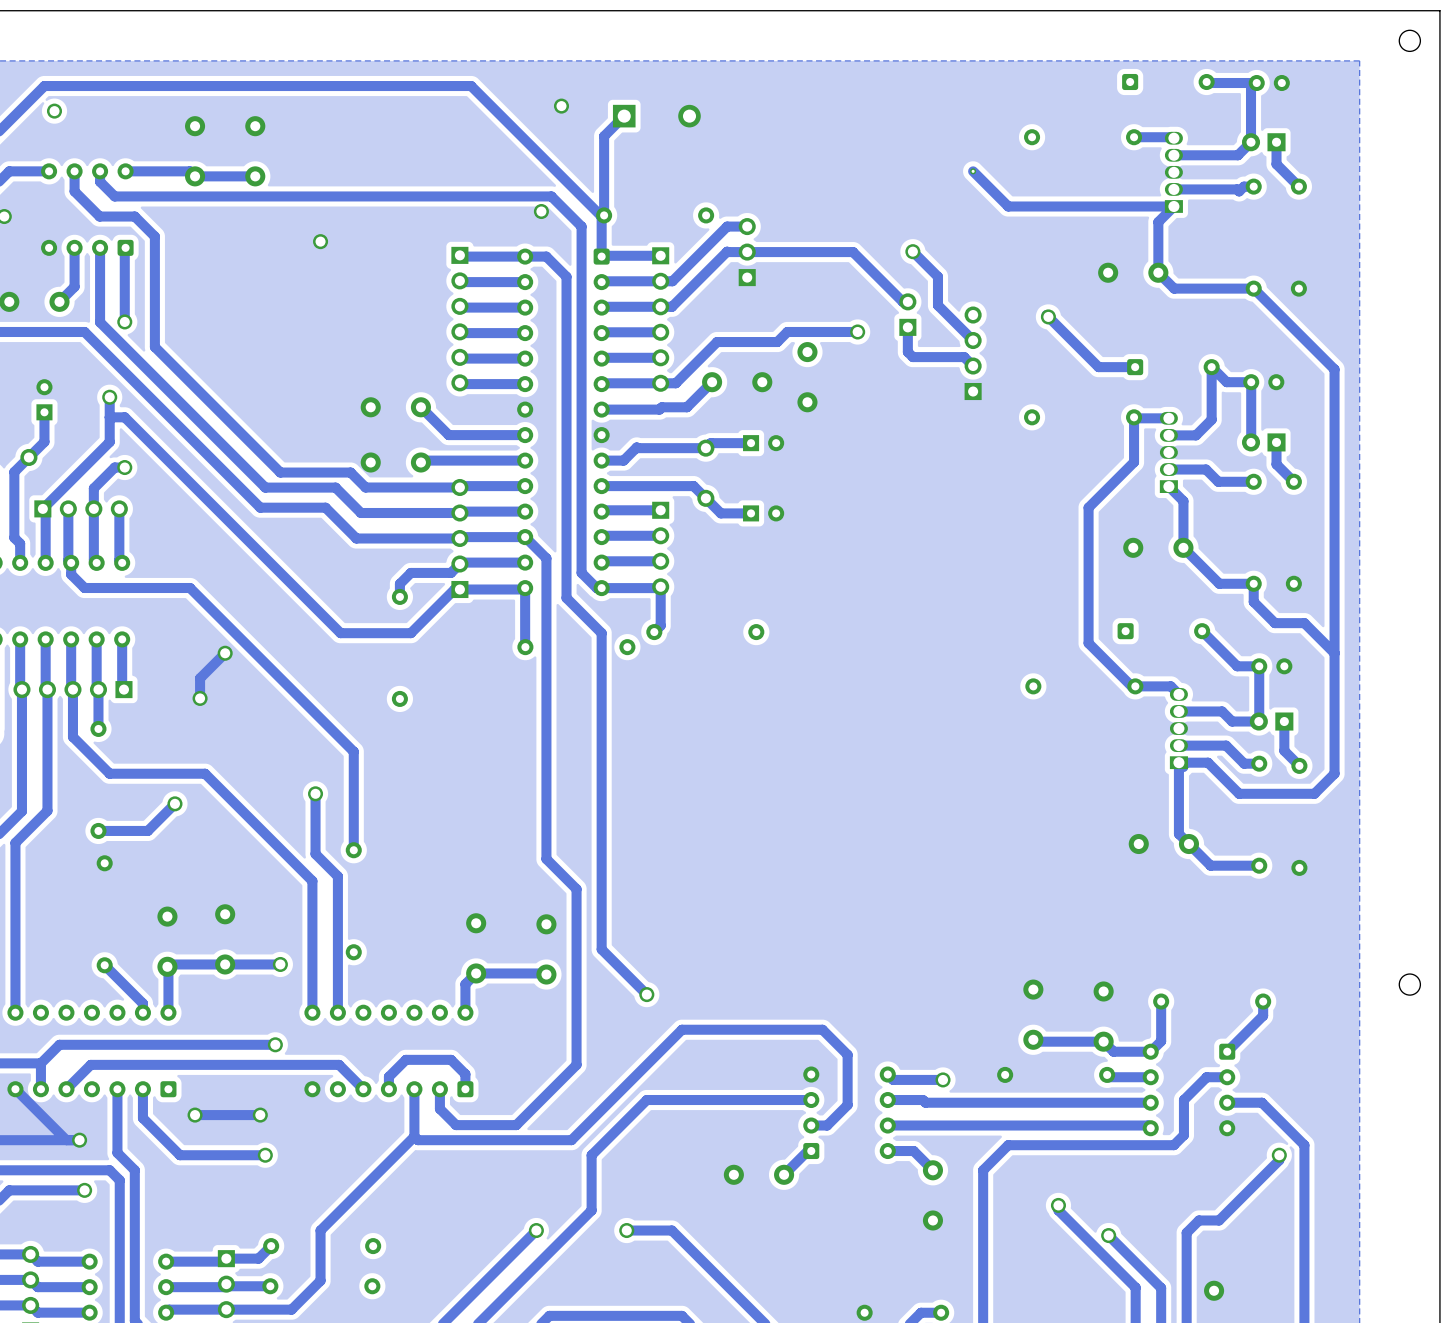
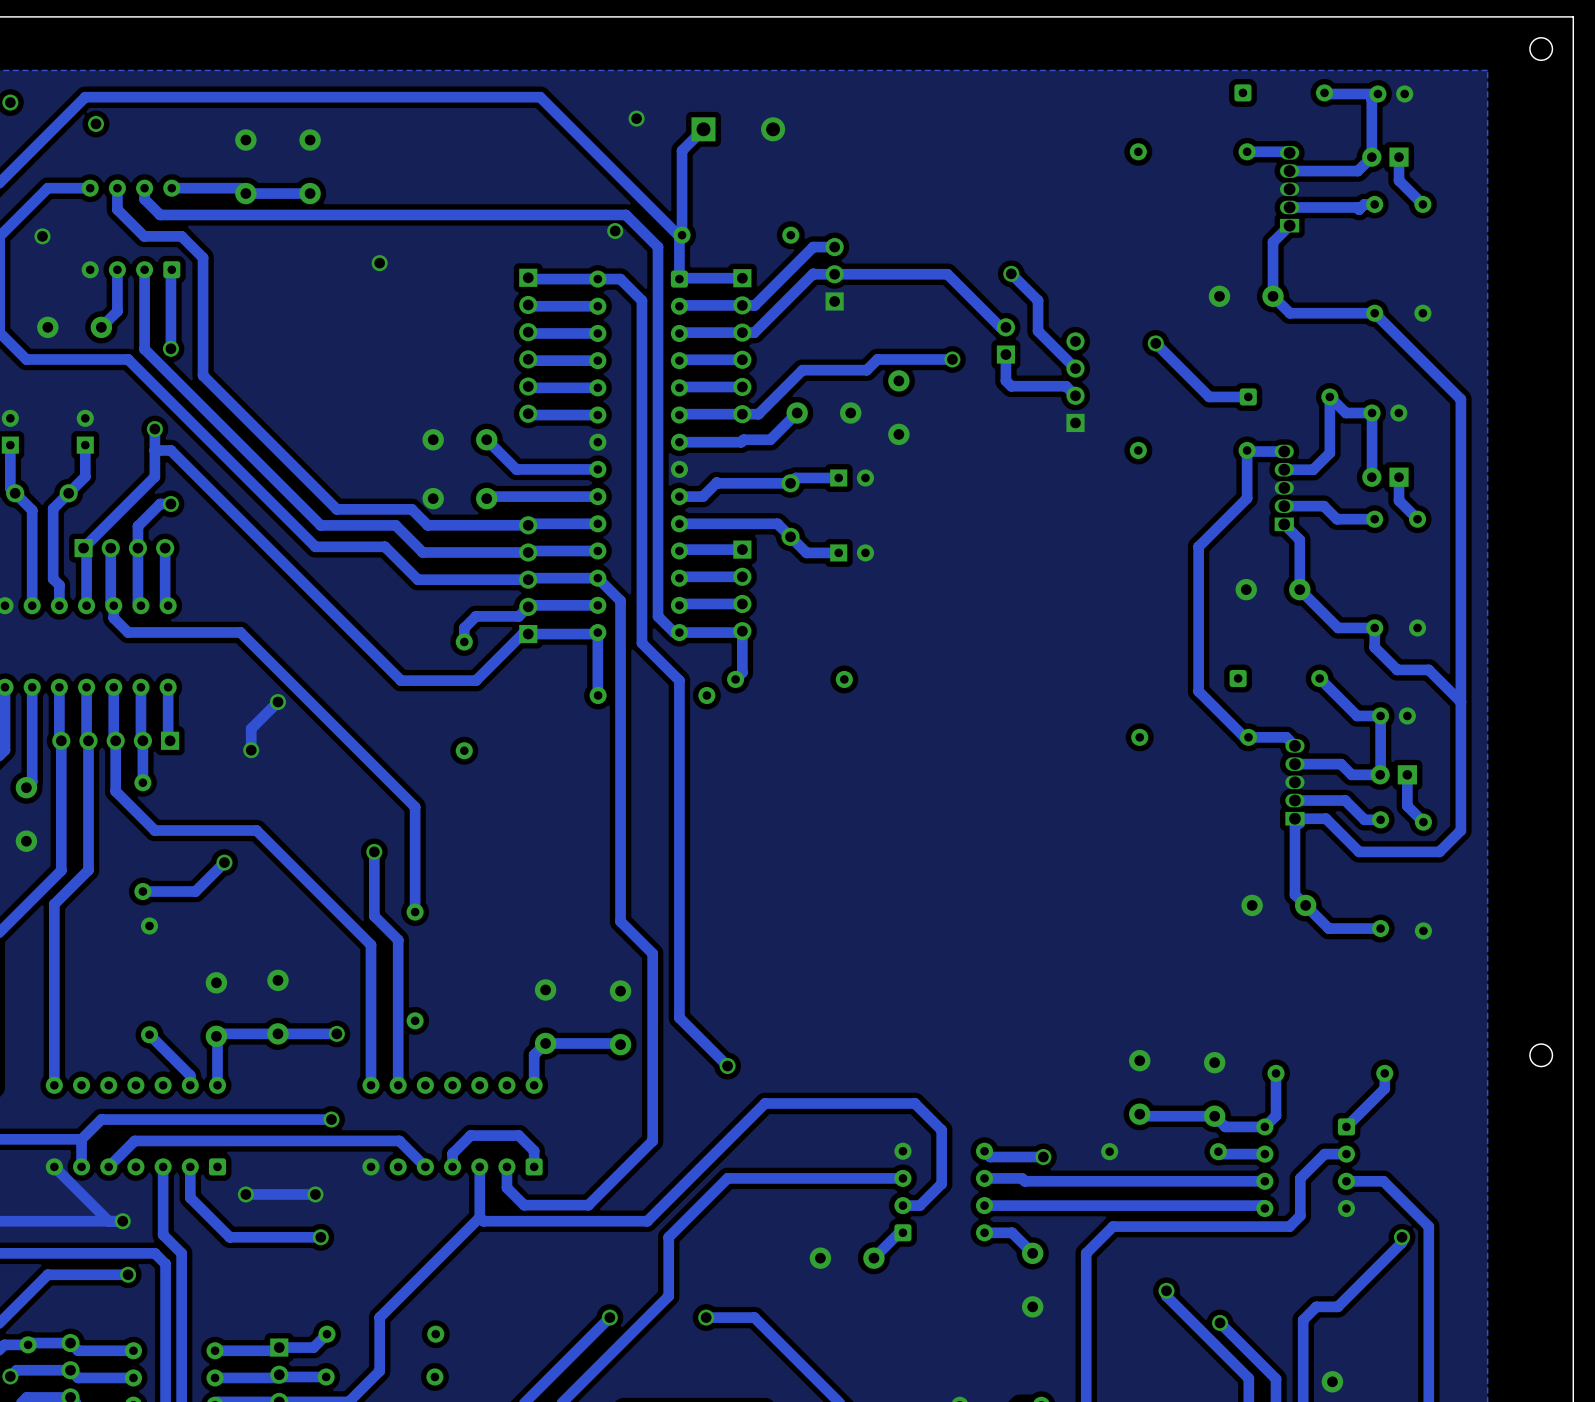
track: (973, 171) (1008, 206) (1173, 206) -> none
via: (973, 171) -> none

